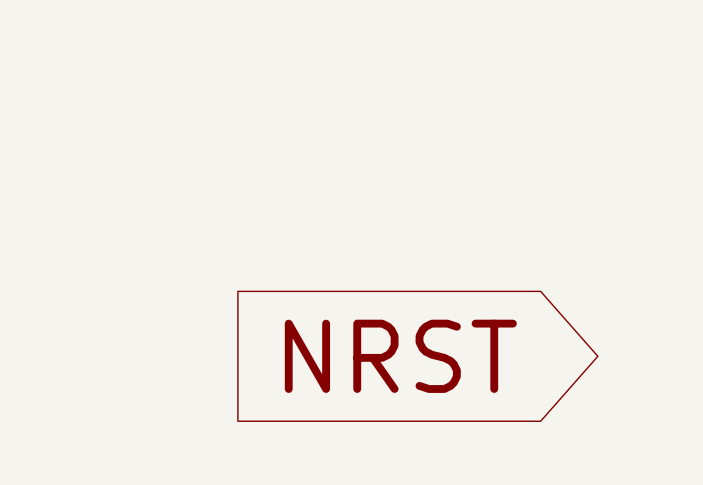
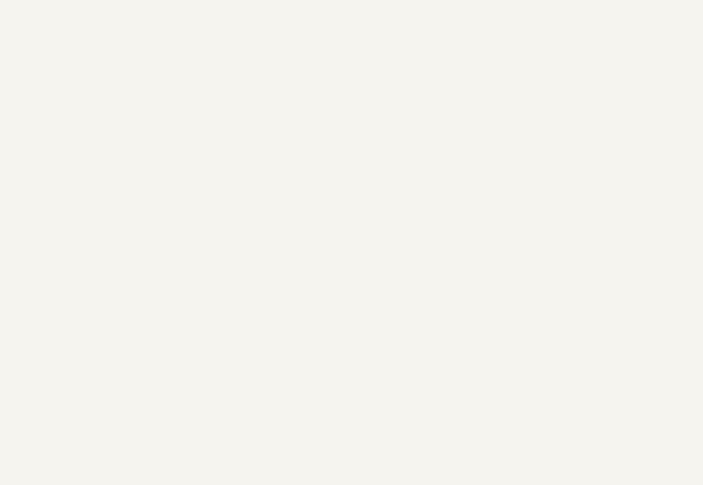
global label: NRST (400, 356) -> none

